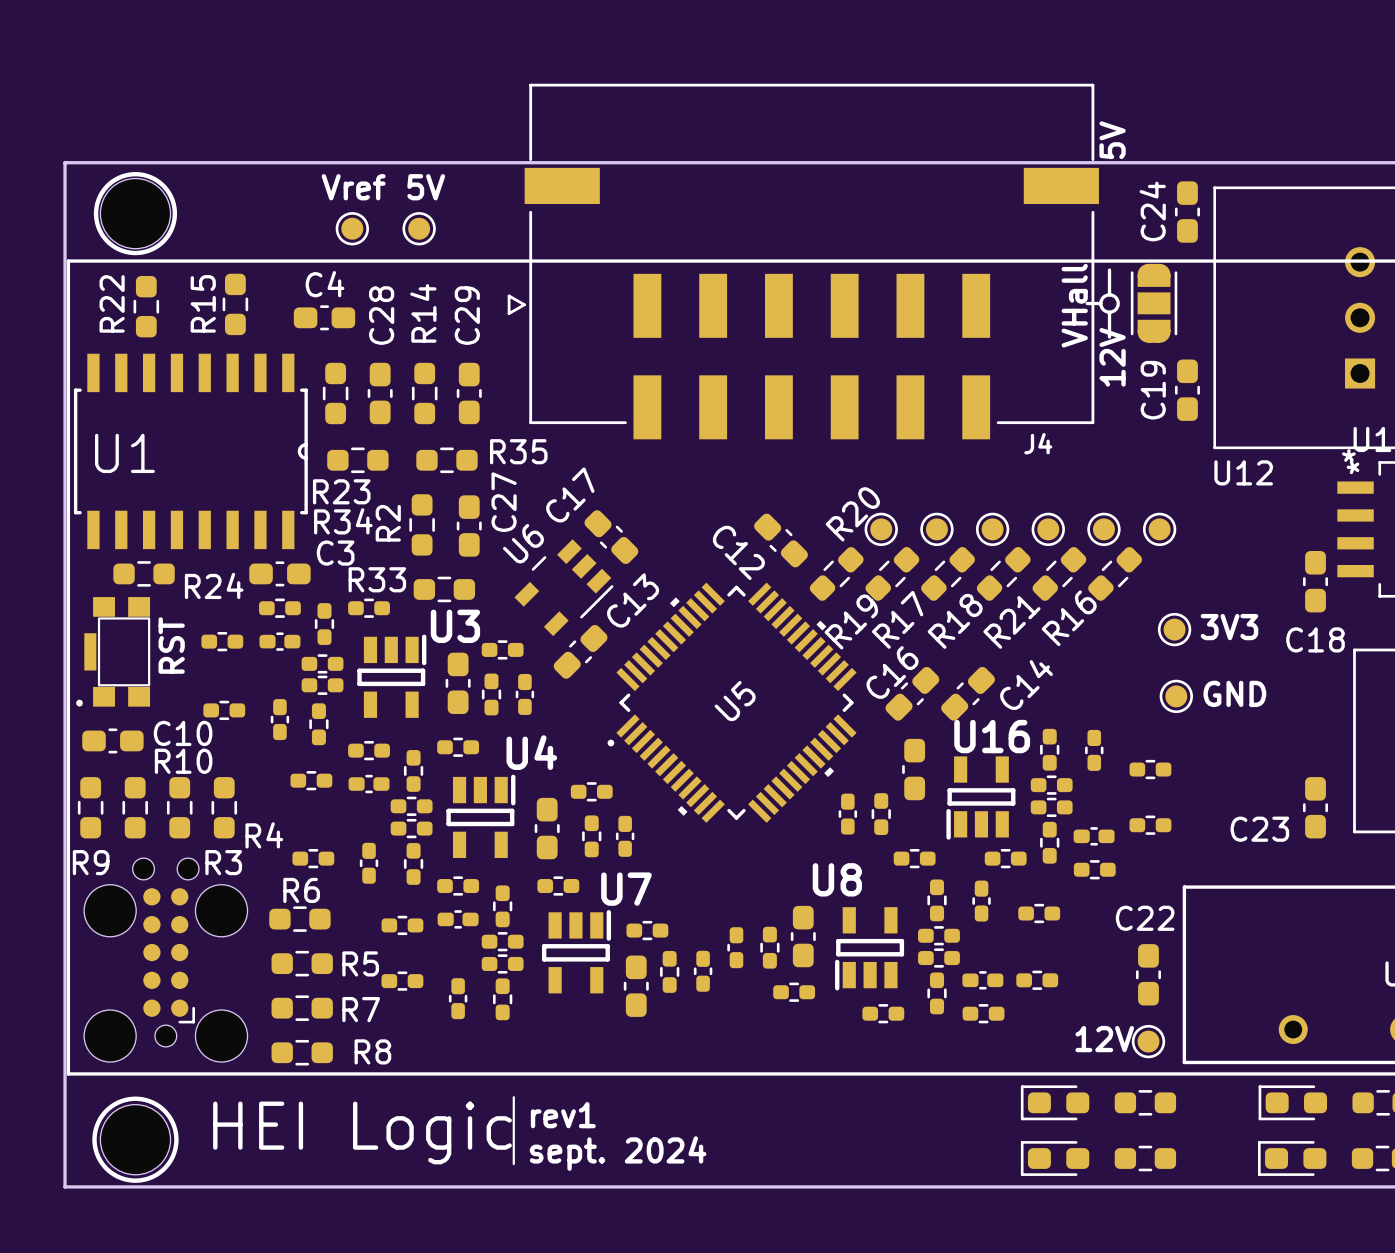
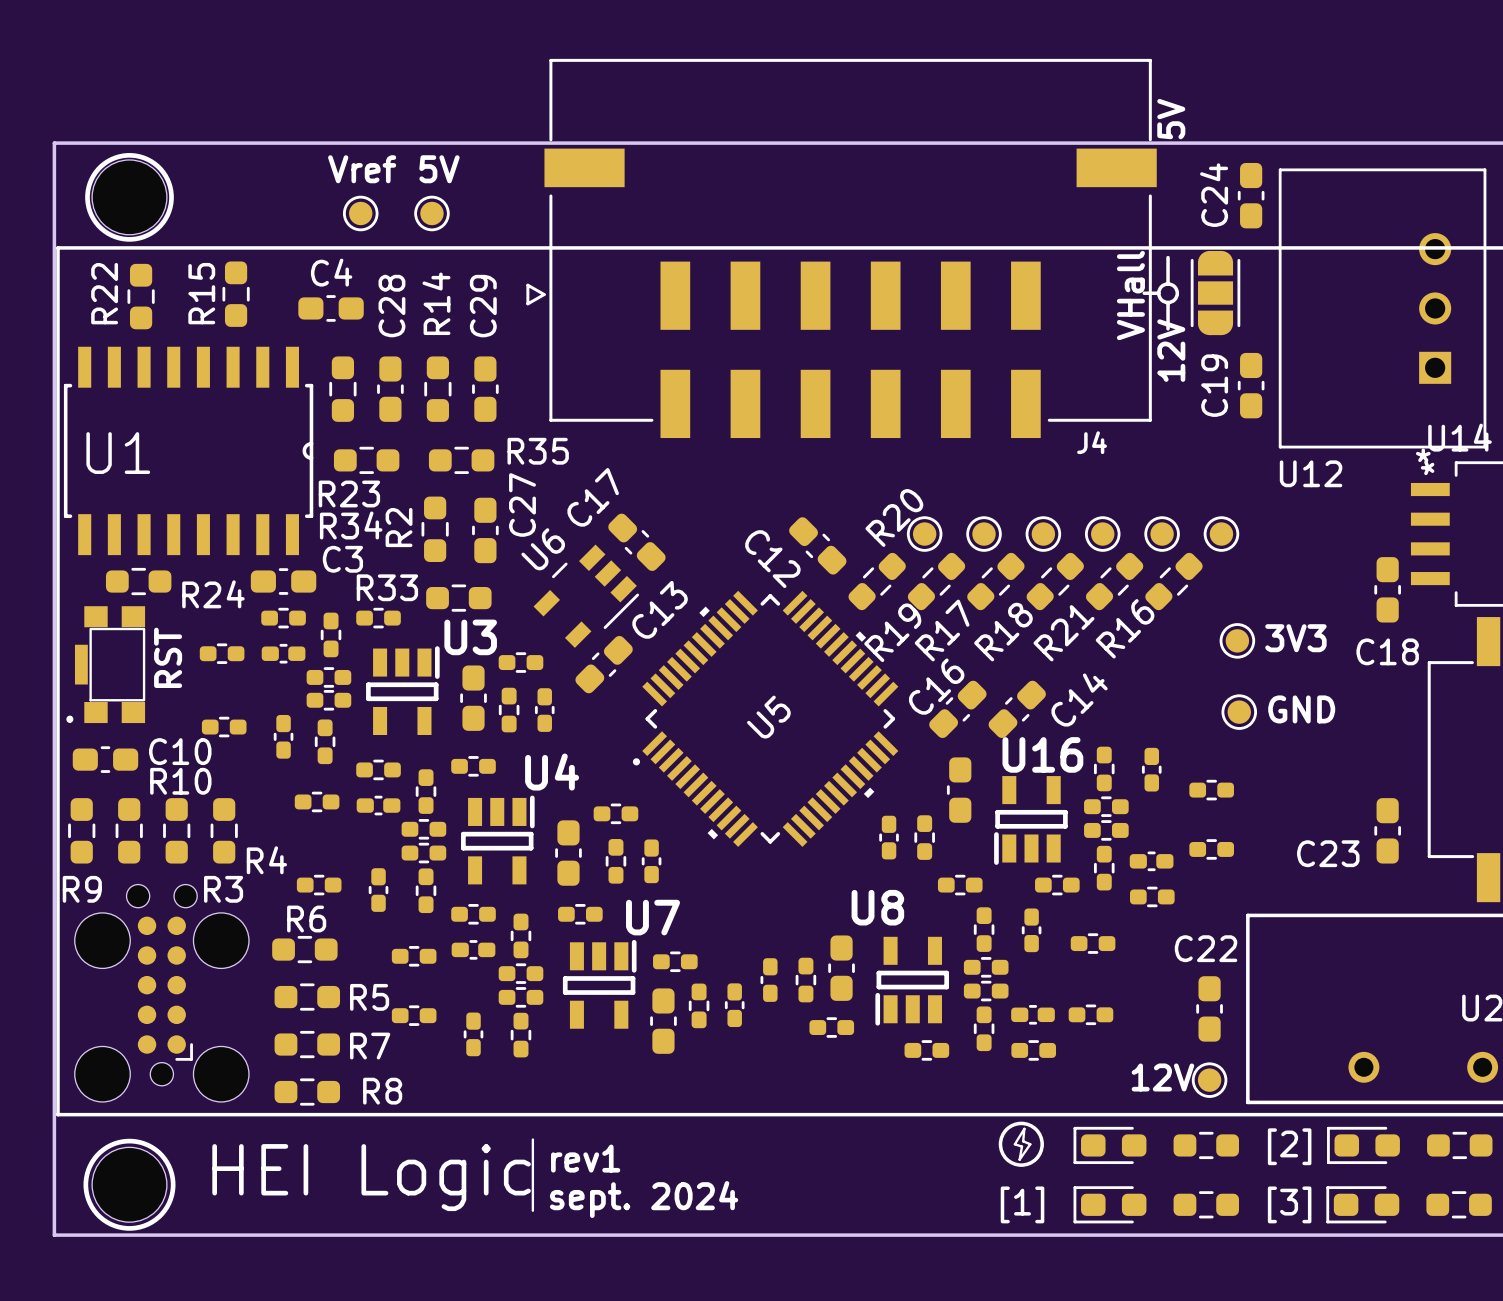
drawing: none -> [998, 1121, 1044, 1167]
line: none -> (1024, 1128) (1014, 1144) (1022, 1146) (1019, 1159) (1030, 1144) (1023, 1141) (1024, 1128)
text: none -> [2] (1289, 1146)
text: none -> [1] (1022, 1204)
text: none -> [3] (1289, 1204)

